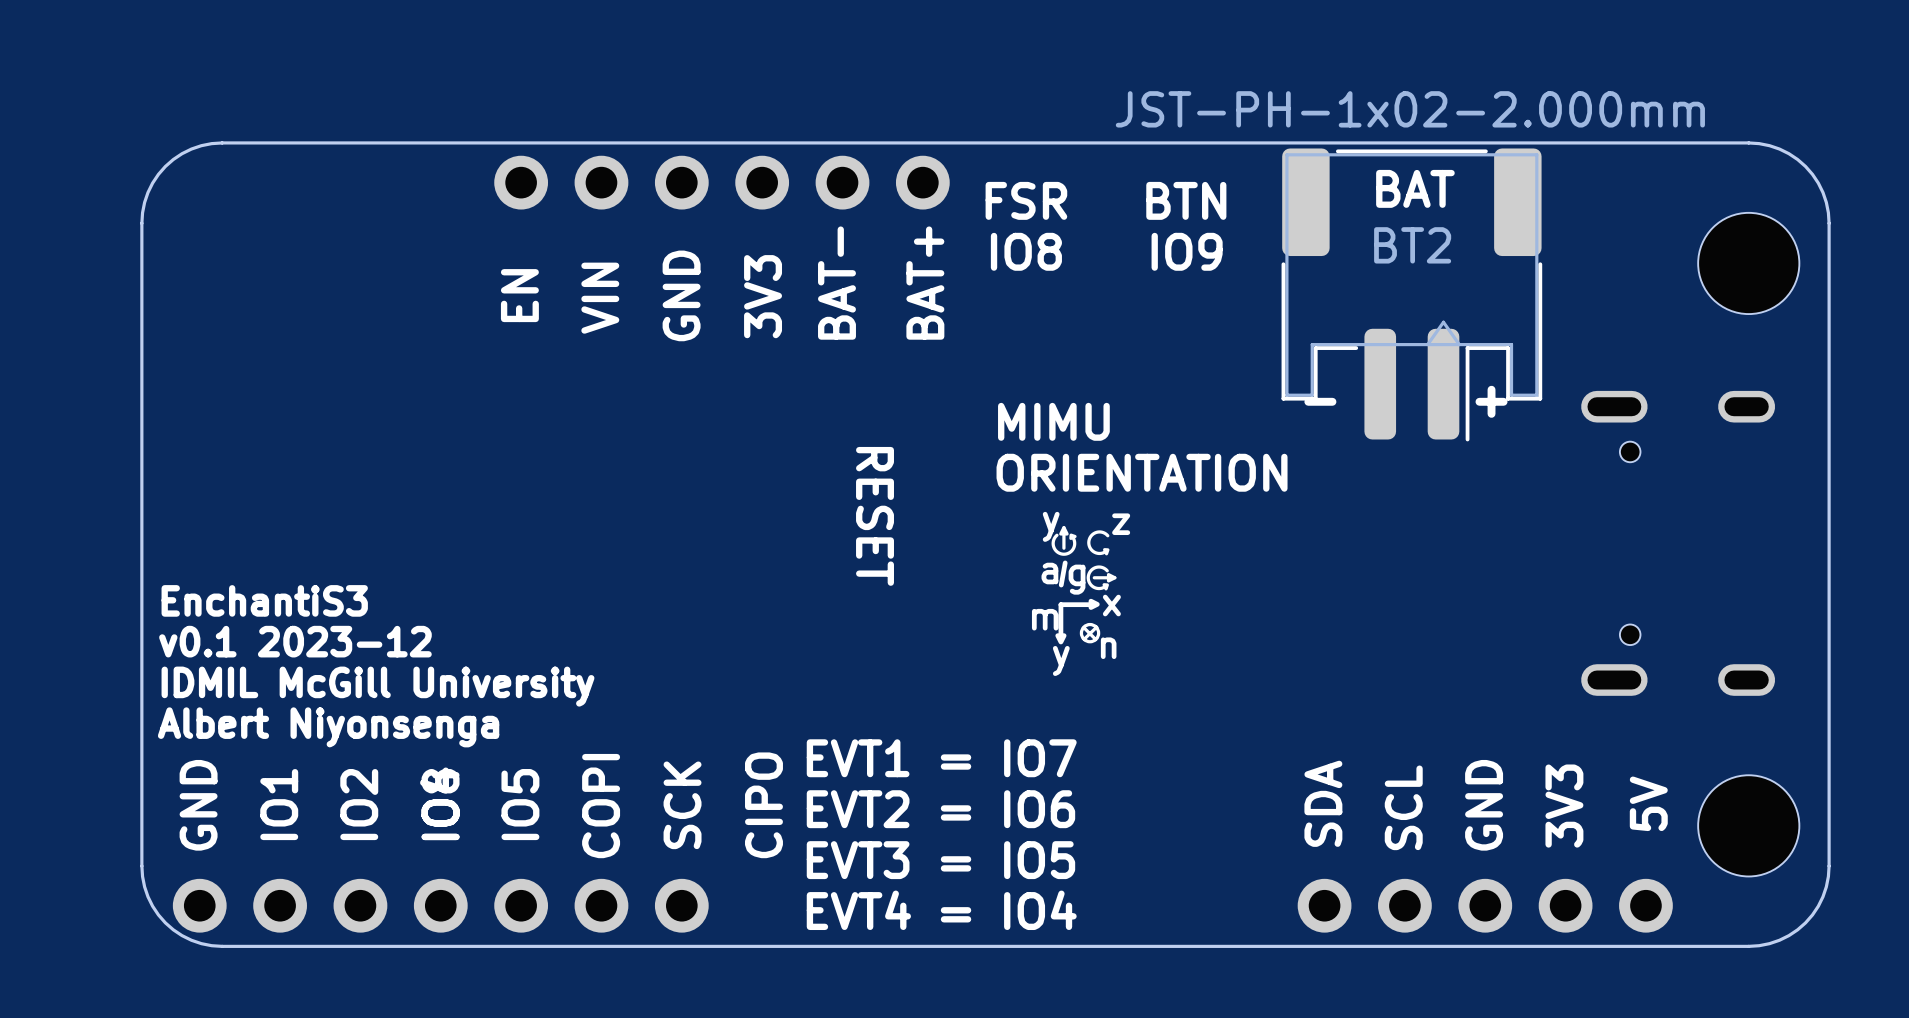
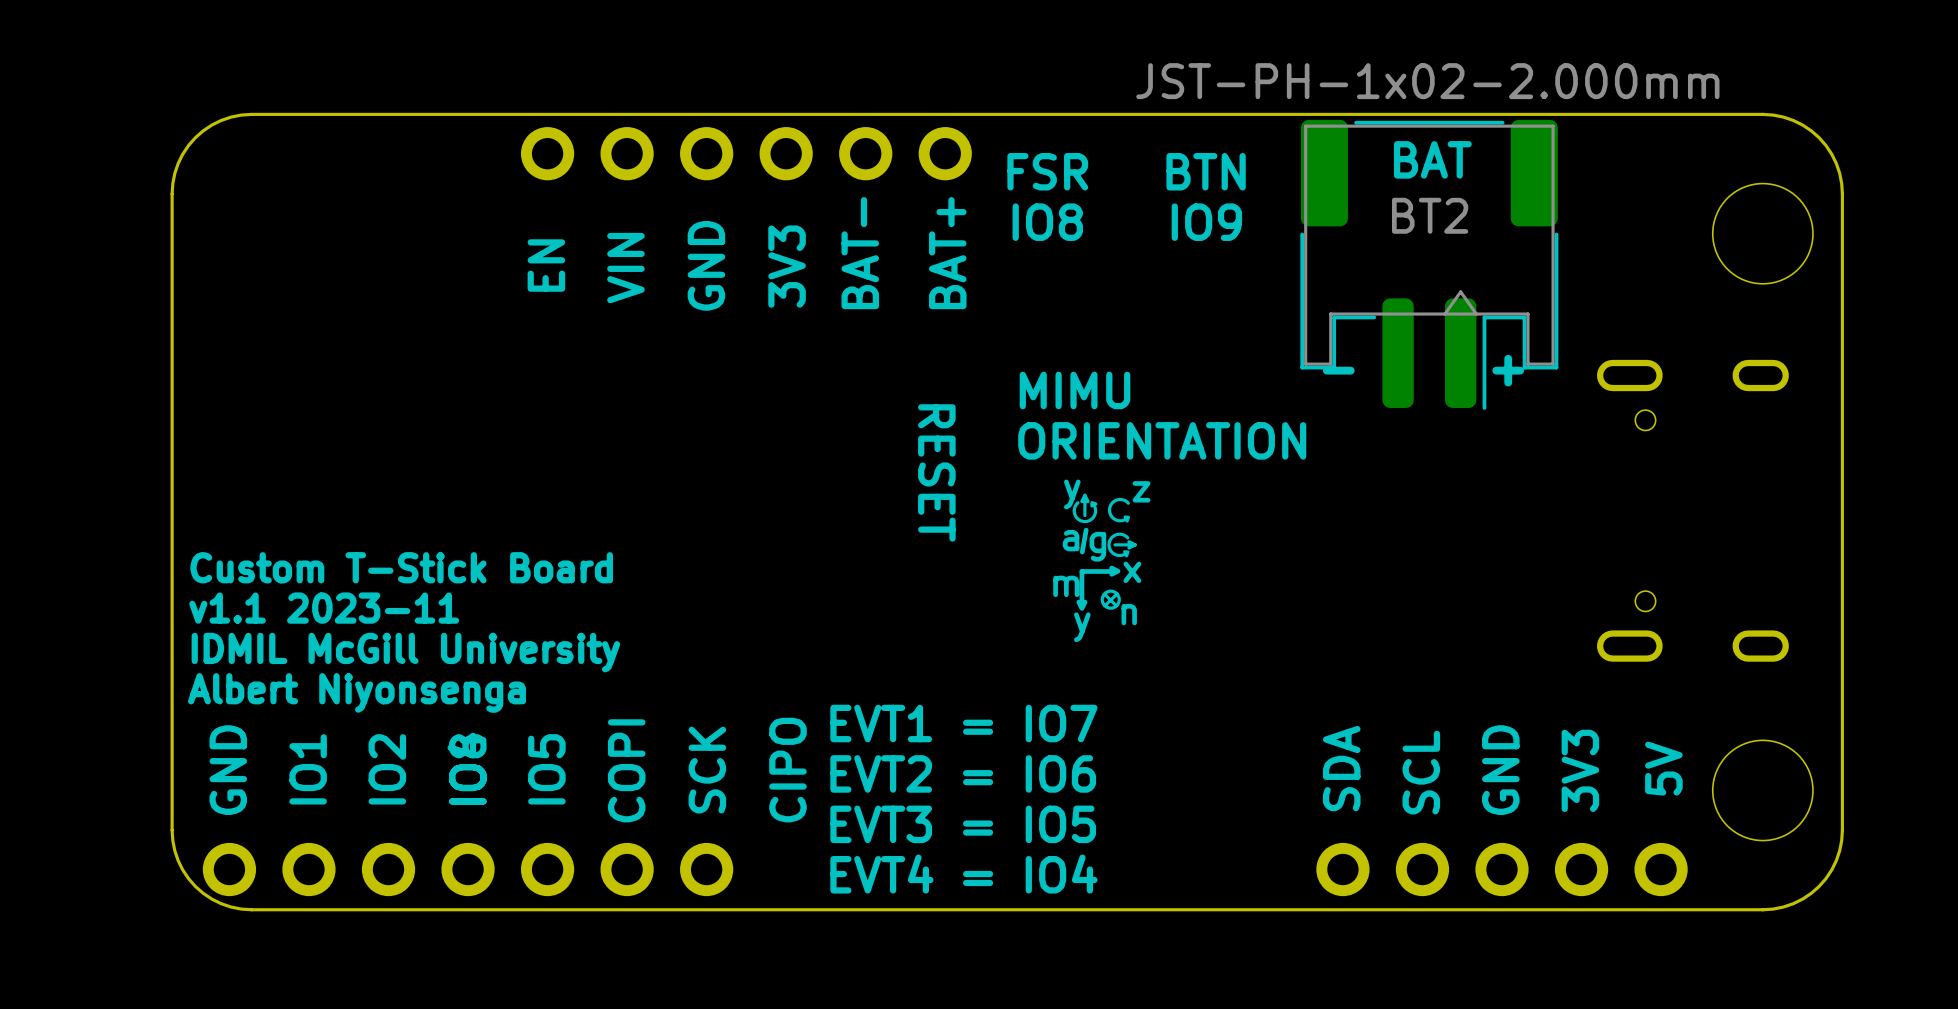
text position: RESET (875, 516) -> RESET (936, 472)
text: EnchantiS3 (264, 600) -> Custom T-Stick Board (401, 567)
text: v0.1 2023-12 (295, 641) -> v1.1 2023-11 (324, 608)

